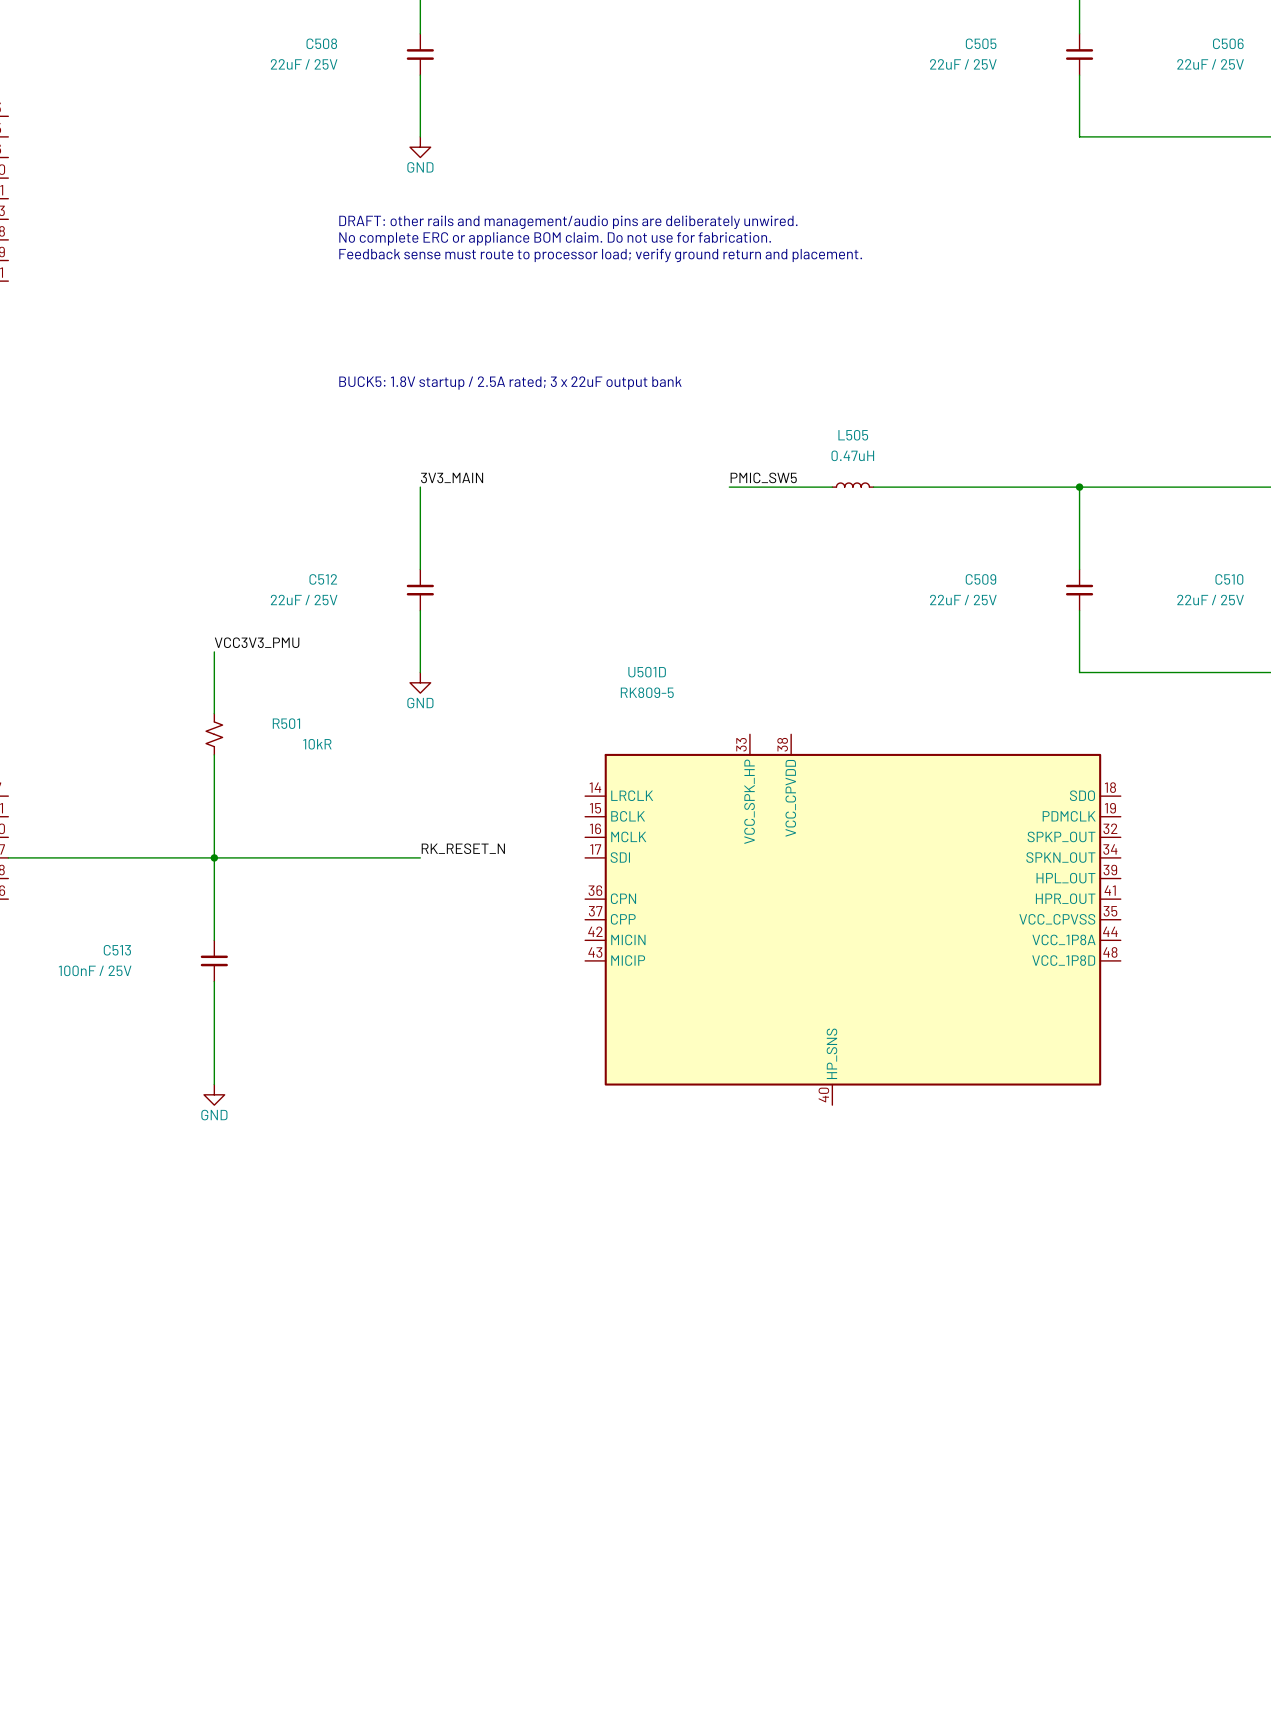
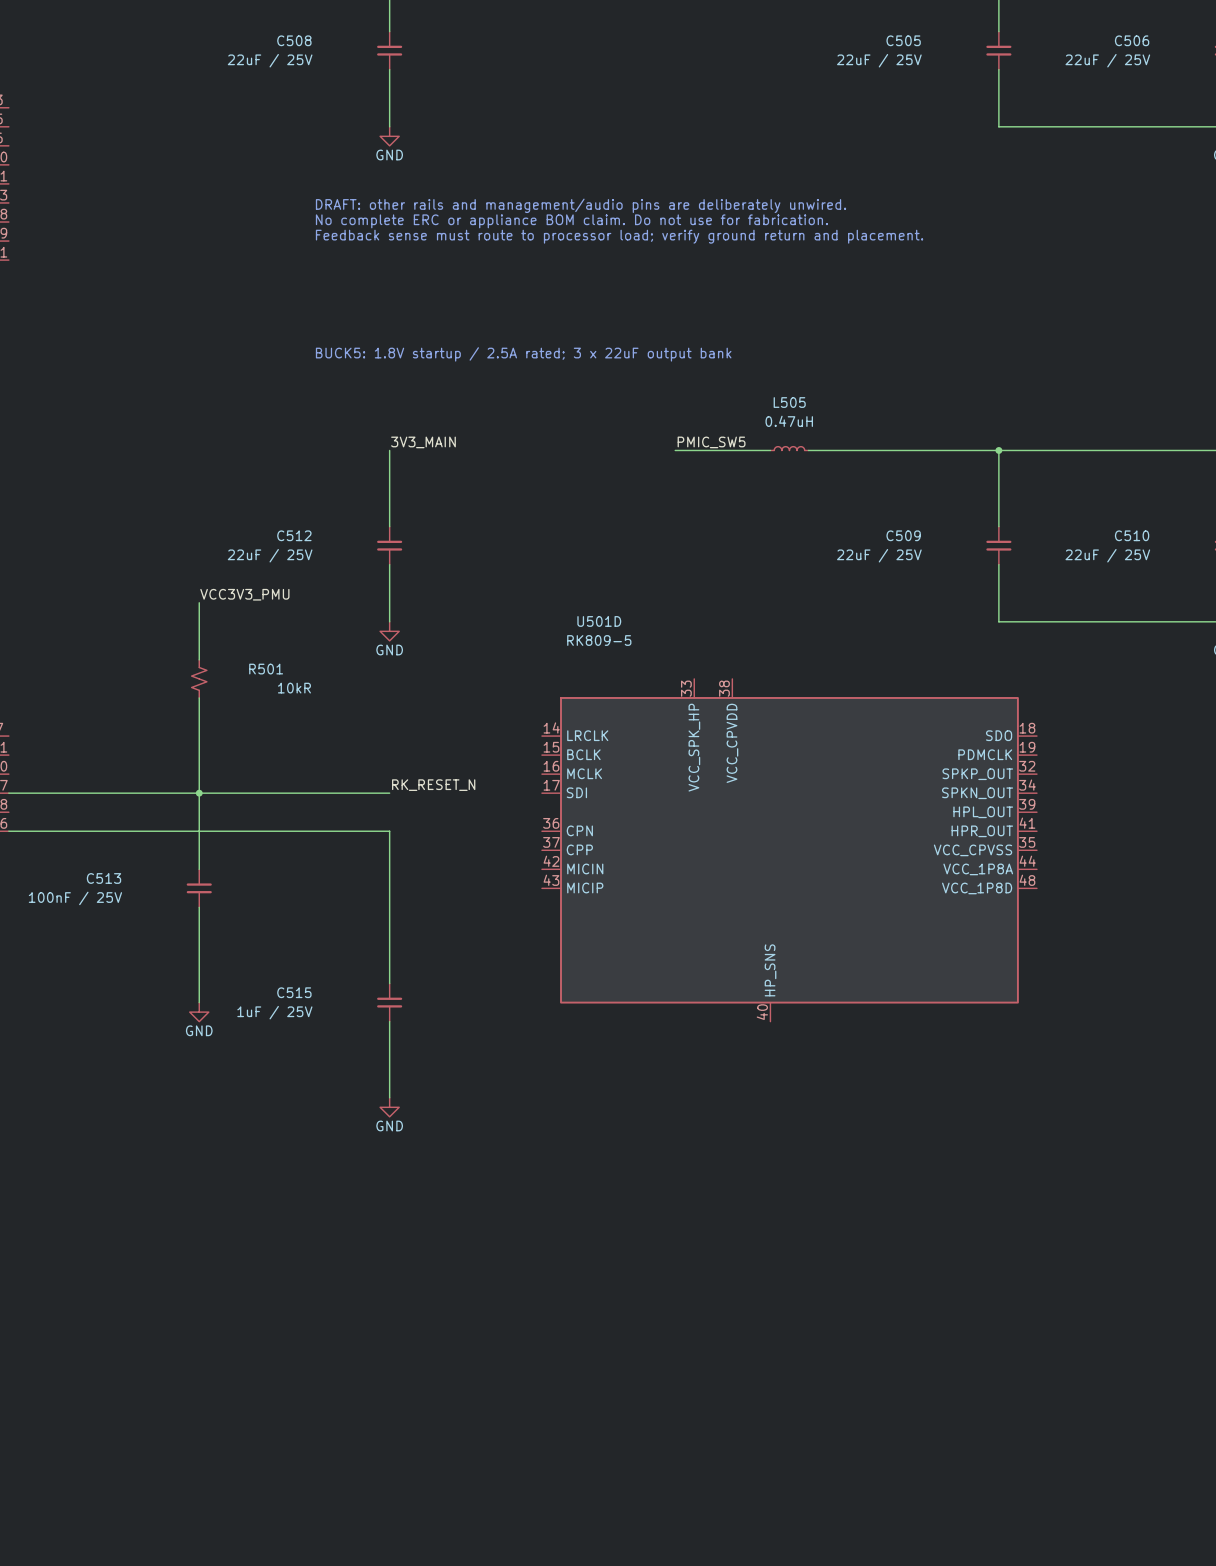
wire: none -> (8, 831) (389, 831) (389, 983)
C515: none -> 1uF / 25V (389, 1002)
wire: none -> (389, 1021) (389, 1097)
power symbol: none -> GND (389, 1107)

